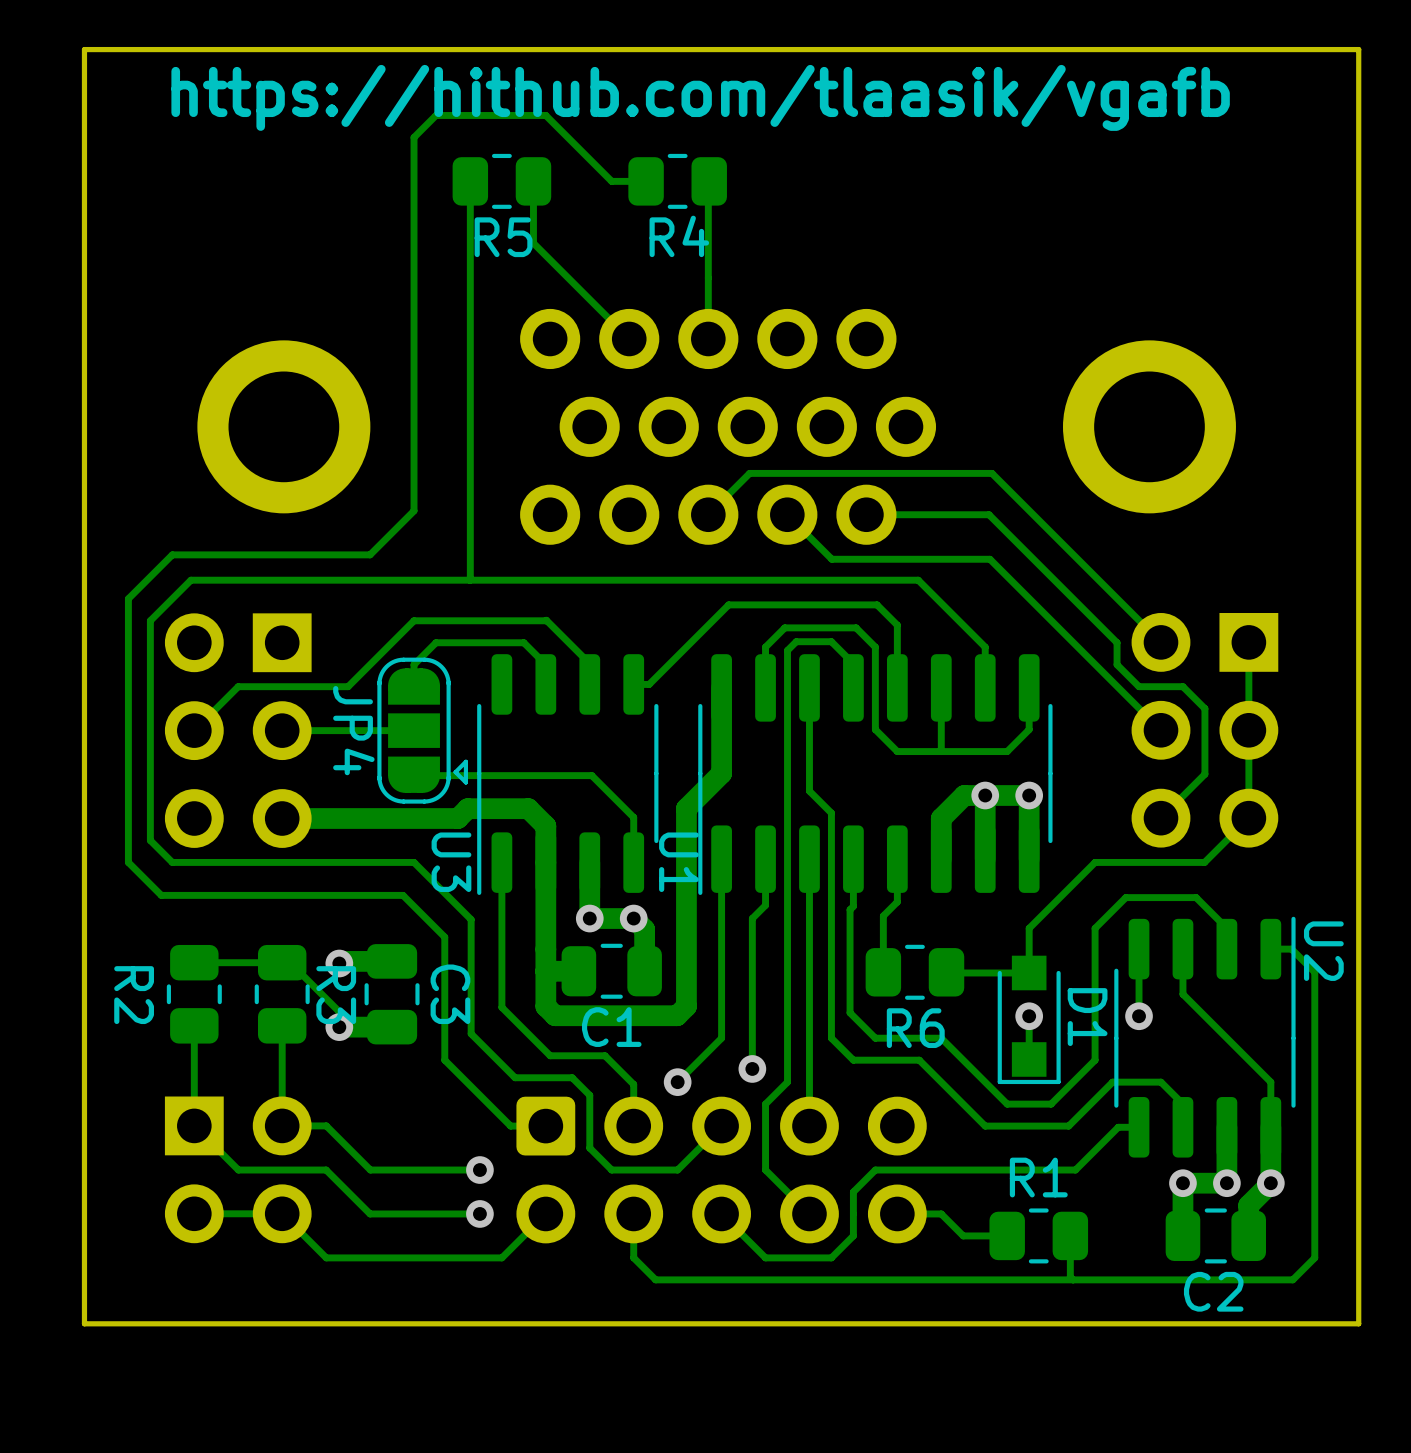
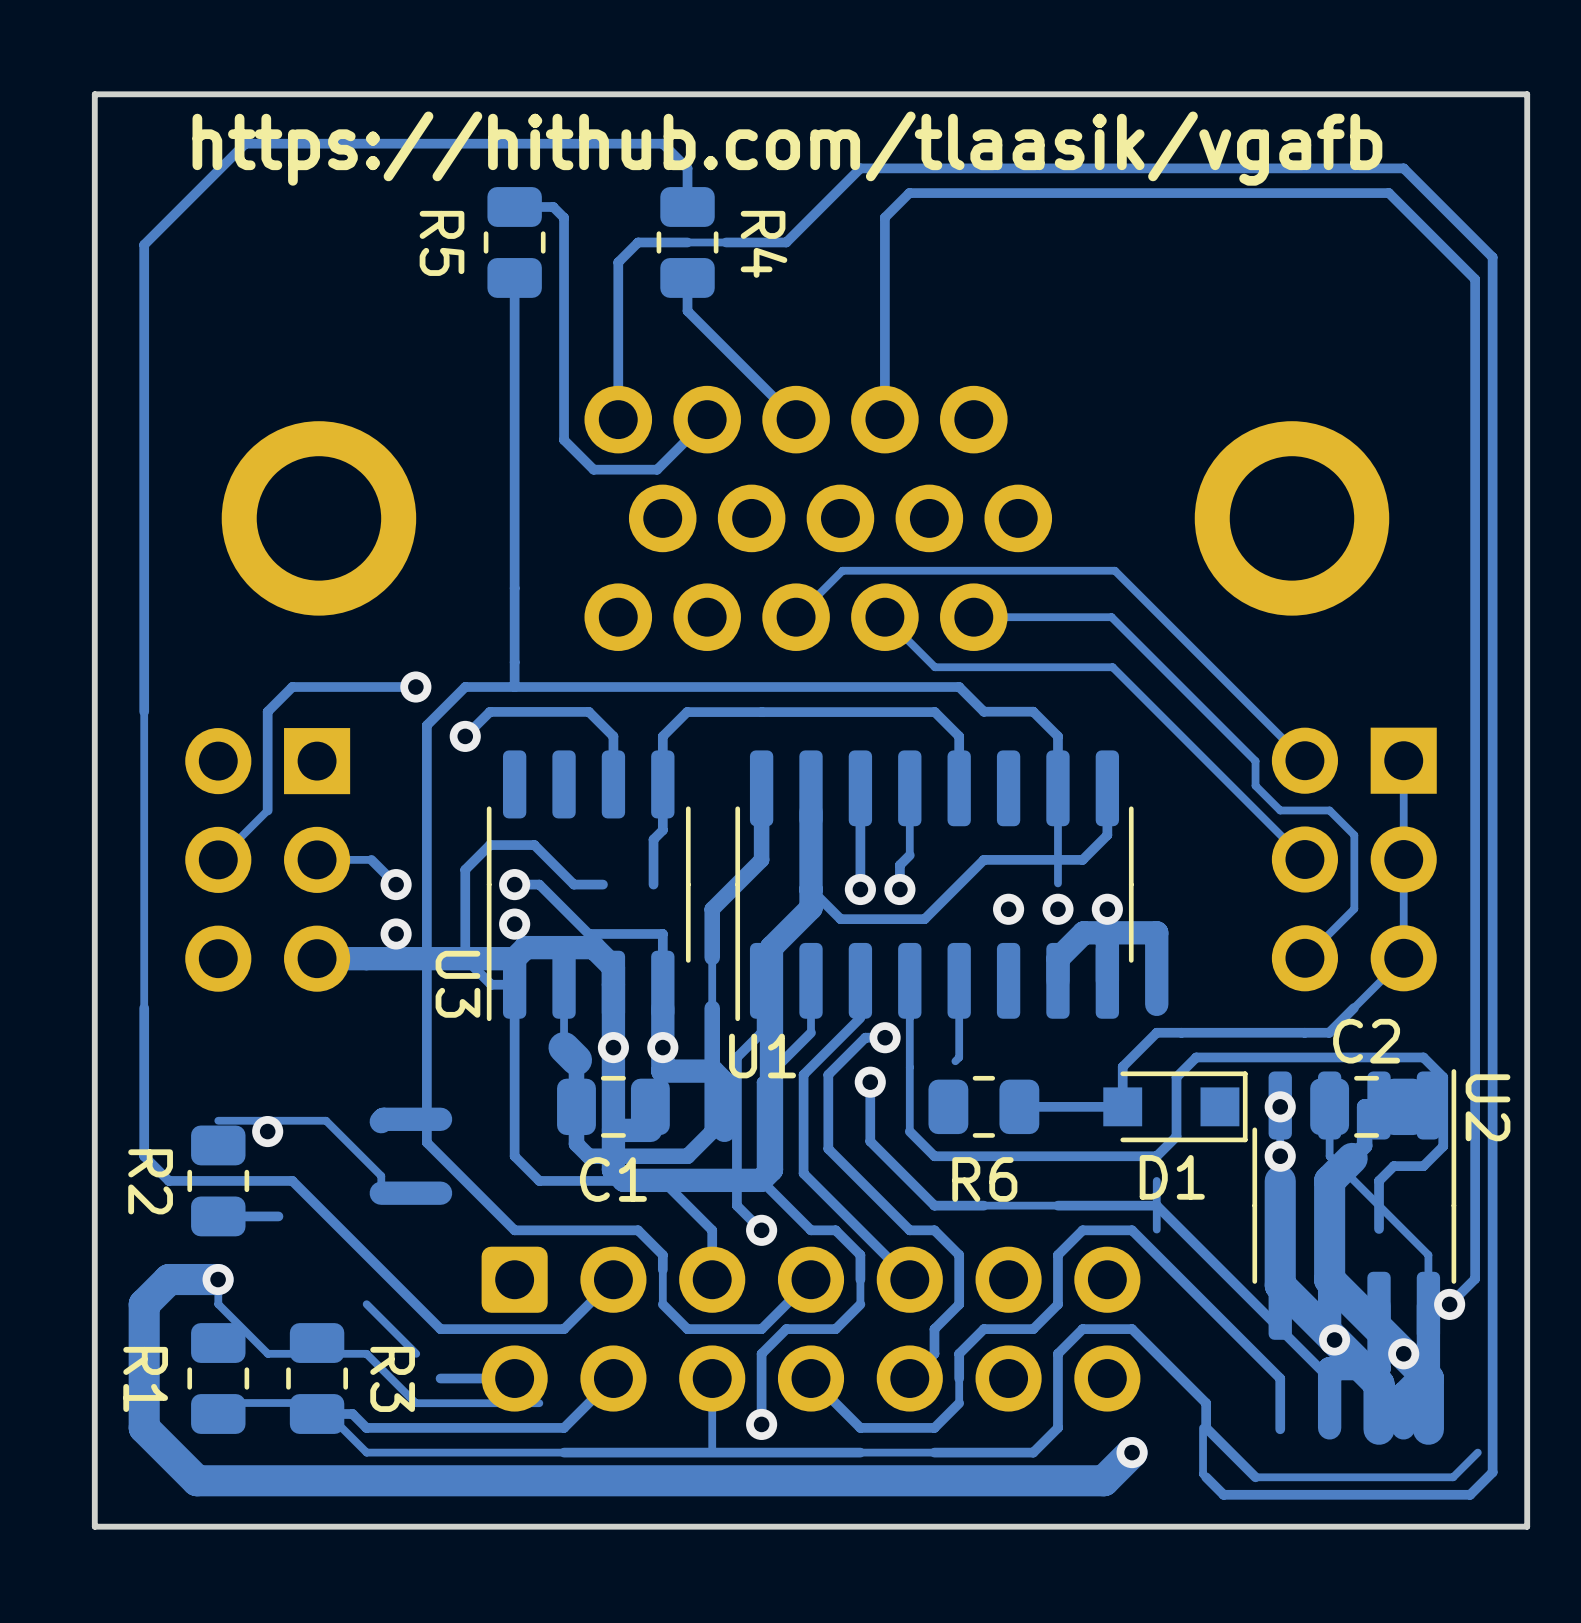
track: (470, 181) (470, 579) -> none
R5 rotation: 0° (501, 181) -> 90° clockwise (514, 242)
track: (533, 181) (533, 243) (629, 338) -> (514, 206) (553, 206) (564, 217) (564, 440) (593, 469) (657, 469) (707, 419)
track: (611, 181) (545, 115) (435, 115) (414, 137) (414, 510) (370, 554) (172, 554) (128, 598) -> (687, 206) (687, 168) (662, 143) (245, 143) (144, 244) (144, 711)
track: none -> (687, 242) (638, 242) (618, 262) (618, 419)
track: none -> (726, 242) (786, 242) (860, 168) (1403, 168) (1492, 257) (1492, 1472) (1470, 1494) (1223, 1494) (1206, 1477)
R4 rotation: 0° (677, 181) -> 90° clockwise (687, 242)
R4 position: (677, 181) -> (687, 242)
track: (709, 181) (708, 338) -> (687, 277) (687, 311) (796, 419)
track: none -> (514, 277) (514, 687)
R4 name position: R4 (679, 236) -> R4 (763, 244)
track: none -> (884, 419) (884, 217) (909, 193) (1388, 193) (1475, 279) (1475, 1278) (1449, 1304)
via: none -> (415, 687)
track: none -> (465, 736) (489, 711) (588, 711) (613, 736) (613, 784)
via: none -> (465, 736)
track: (589, 663) (546, 620) (414, 620) (348, 686) (238, 686) -> (415, 687) (292, 687) (267, 711) (267, 810)
track: (853, 663) (831, 641) (796, 641) (787, 650) (787, 1082) (765, 1104) -> (959, 784) (959, 736) (934, 712) (687, 712) (662, 736) (662, 784)
track: (765, 666) (765, 647) (784, 627) (856, 627) (875, 647) (875, 729) (897, 751) (1007, 751) (1029, 729) (1029, 687) -> none
track: (897, 666) (897, 625) (877, 604) (728, 604) (649, 684) (633, 684) -> none
track: (985, 666) (985, 647) (918, 580) (190, 580) (150, 620) (150, 840) (172, 862) (414, 862) (471, 919) (471, 1033) (515, 1077) (572, 1077) (589, 1095) -> (1057, 788) (1057, 736) (1033, 711) (983, 711) (959, 687) (465, 687) (426, 725) (426, 1142) (514, 1230) (638, 1230) (662, 1255) (662, 1269)
track: (545, 684) (545, 664) (523, 642) (435, 642) (414, 664) (414, 685) -> none
track: none -> (662, 807) (662, 830) (653, 839) (653, 884)
track: none -> (860, 811) (860, 889)
track: none -> (1107, 811) (1107, 835) (1082, 859) (983, 859) (924, 919) (840, 919) (811, 889)
track: (809, 726) (809, 791) (831, 813) (831, 1038) (853, 1060) (919, 1060) (985, 1126) (1068, 1126) (1112, 1082) (1160, 1082) (1182, 1104) (1182, 1127) -> (909, 855) (899, 865) (899, 889)
track: (414, 730) (330, 730) -> (396, 884) (371, 859)
JP4: (422, 730) -> none
via: none -> (396, 884)
track: none -> (514, 884) (539, 884) (588, 933) (662, 933) (662, 984)
via: none -> (514, 884)
via: none -> (860, 889)
via: none -> (899, 889)
U3 position: (567, 774) -> (588, 885)
U1 position: (875, 774) -> (934, 885)
via: none -> (1008, 909)
via: none -> (1057, 909)
track: (414, 775) (591, 775) (633, 817) -> (761, 788) (761, 859) (712, 909) (712, 957)
via: none -> (514, 924)
via position: (985, 795) -> (1107, 909)
via: (1029, 795) -> none
via: none -> (396, 933)
track: none -> (761, 980) (761, 1032) (736, 1057) (736, 1205) (761, 1230)
track: (897, 859) (897, 901) (883, 915) (883, 972) -> none
track: (128, 862) (161, 895) (403, 895) (444, 937) (444, 1060) (510, 1126) (545, 1126) -> (144, 1008) (144, 1156) (168, 1180) (292, 1180) (440, 1329) (564, 1329) (613, 1279)
track: none -> (712, 1008) (712, 1131) (687, 1156) (588, 1156) (576, 1143) (576, 1060) (564, 1047)
U1 name rotation: 0° (678, 862) -> 90° counterclockwise (762, 1056)
track: (1204, 862) (1095, 862) (1029, 928) (1029, 972) (946, 972) -> (1353, 1008) (1329, 1032) (1156, 1032) (1122, 1066) (1122, 1106) (1019, 1106)
track: (765, 871) (765, 905) (752, 918) (752, 1068) -> (860, 1017) (803, 1074) (803, 1173) (909, 1279)
track: (721, 884) (721, 1038) (677, 1082) -> (811, 1032) (761, 1082) (761, 1180) (811, 1230) (835, 1230) (860, 1255) (860, 1279)
track: none -> (885, 1037) (865, 1037) (828, 1074) (828, 1148) (909, 1230) (934, 1230) (959, 1255) (959, 1304) (934, 1329) (934, 1353) (909, 1378)
via: none -> (885, 1037)
track: (501, 897) (501, 1007) (550, 1055) (605, 1055) (633, 1084) -> (602, 884) (573, 884) (534, 845) (489, 845) (465, 869) (465, 958) (491, 984) (514, 984) (514, 1156) (539, 1180) (662, 1180) (712, 1230) (712, 1257)
via: none -> (613, 1047)
track: (850, 909) (850, 1012) (875, 1038) -> (870, 1082) (870, 1141) (934, 1205) (983, 1205)
via position: (589, 918) -> (662, 1047)
via: (633, 918) -> none
via: none -> (870, 1082)
track: (1226, 949) (1226, 928) (1196, 897) (1125, 897) (1095, 928) (1095, 1060) (1051, 1104) (1007, 1104) (941, 1038) -> (1329, 1378) (1156, 1205) (1057, 1205)
track: (1270, 949) (1291, 949) (1314, 972) (1314, 1257) -> none
via: none -> (1280, 1106)
track: none -> (1403, 1106) (1364, 1106) (1364, 1145) (1329, 1180) (1329, 1279) (1428, 1378) (1428, 1429)
via: (339, 963) -> none
C1 position: (611, 971) -> (613, 1106)
via: none -> (267, 1131)
track: (809, 972) (809, 1126) -> (909, 1131) (934, 1156) (1156, 1156) (1176, 1136) (1176, 1077) (1196, 1057) (1423, 1057) (1443, 1077) (1443, 1146) (1423, 1166) (1393, 1166) (1379, 1180) (1379, 1228)
R6 position: (914, 972) -> (983, 1106)
R2 position: (194, 994) -> (218, 1180)
R3 position: (282, 994) -> (317, 1378)
C3: (392, 994) -> none
R3 name position: R3 (336, 995) -> R3 (392, 1379)
via: (1029, 1016) -> none
track: none -> (1280, 1180) (1280, 1285) (1379, 1384) (1379, 1429)
via position: (1139, 1016) -> (1280, 1156)
D1 name position: D1 (1087, 1017) -> D1 (1172, 1177)
D1 rotation: 0° (1029, 1019) -> 90° counterclockwise (1175, 1106)
track: (194, 1025) (194, 1104) -> (1132, 1452) (1103, 1480) (197, 1480) (144, 1427) (144, 1304) (169, 1279) (218, 1279)
track: (282, 1025) (282, 1125) (326, 1125) -> none
via: (339, 1027) -> none
C1 name position: C1 (611, 1027) -> C1 (613, 1179)
R6 name position: R6 (915, 1028) -> R6 (984, 1179)
track: none -> (278, 1216) (218, 1216)
via: (752, 1068) -> none
via position: (677, 1082) -> (761, 1230)
part footprint: [516, 1096, 927, 1244] -> [481, 1246, 1141, 1412]
via: none -> (218, 1279)
track: (721, 1104) (721, 1126) (677, 1170) (611, 1170) (589, 1148) (589, 1126) -> (811, 1279) (761, 1329) (687, 1329) (662, 1304)
track: (765, 1126) (765, 1170) (809, 1213) -> (860, 1304) (835, 1329) (786, 1329) (761, 1353) (761, 1424)
via: none -> (1449, 1304)
track: (1139, 1127) (1118, 1127) (1075, 1170) (875, 1170) (853, 1191) -> (1280, 1429) (1280, 1378) (1132, 1230) (1082, 1230) (1057, 1255) (1057, 1304) (1033, 1329) (983, 1329) (959, 1353) (959, 1378)
part: (238, 1169) -> none
track: (479, 1170) (370, 1170) -> none
via: (479, 1170) -> none
via: none -> (1403, 1353)
R1 name position: R1 (1038, 1177) -> R1 (145, 1379)
via position: (1182, 1183) -> (1334, 1339)
via: (1226, 1183) -> none
via: (1270, 1183) -> none
track: none -> (514, 1378) (440, 1378)
track: none -> (613, 1378) (564, 1427) (366, 1427) (352, 1414) (317, 1414)
via: (479, 1213) -> none
track: (545, 1213) (501, 1257) -> none
track: (721, 1213) (765, 1257) -> (564, 1452) (860, 1452)
track: (853, 1213) (853, 1235) (831, 1257) -> (959, 1403) (934, 1427) (860, 1427) (811, 1378)
track: (897, 1213) (941, 1213) (963, 1235) (1007, 1235) -> none
via: none -> (761, 1424)
R1 rotation: 0° (1038, 1235) -> 90° clockwise (218, 1378)
R1 position: (1038, 1235) -> (218, 1378)
C2 position: (1215, 1235) -> (1366, 1106)
track: (633, 1257) (655, 1279) (1117, 1279) -> (934, 1452) (1033, 1452) (1057, 1427) (1057, 1353) (1082, 1329) (1132, 1329) (1206, 1403) (1206, 1427) (1255, 1477)
via: none -> (1132, 1452)
C2 name position: C2 (1213, 1291) -> C2 (1366, 1041)

